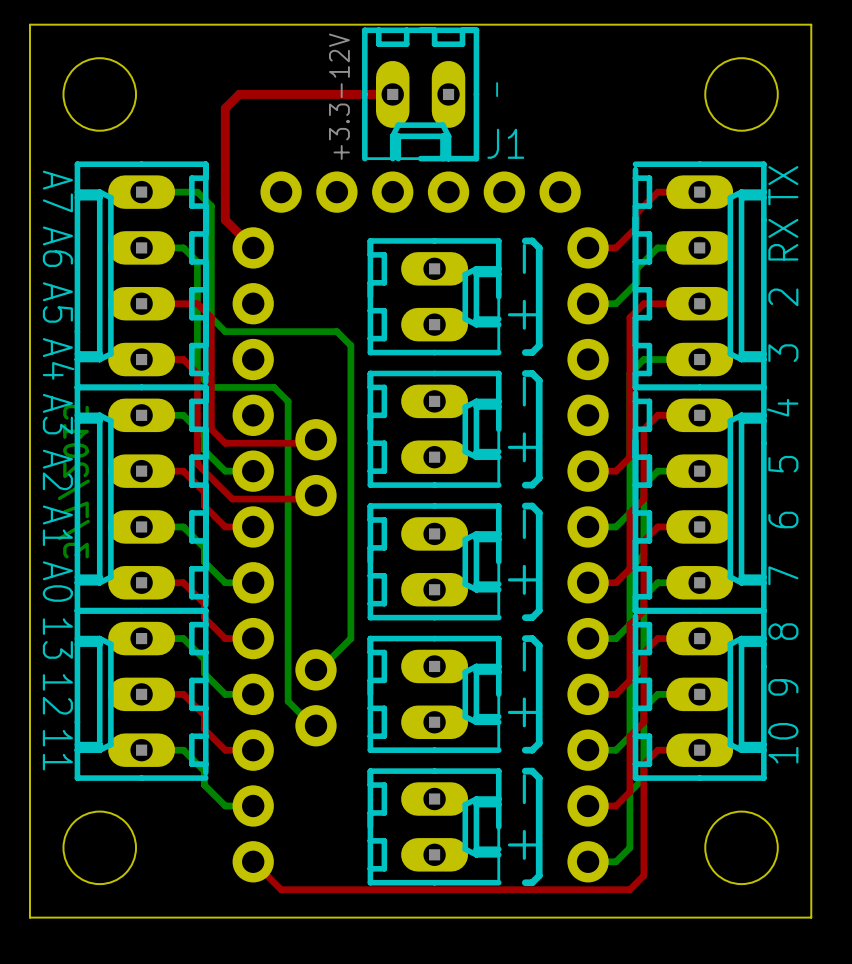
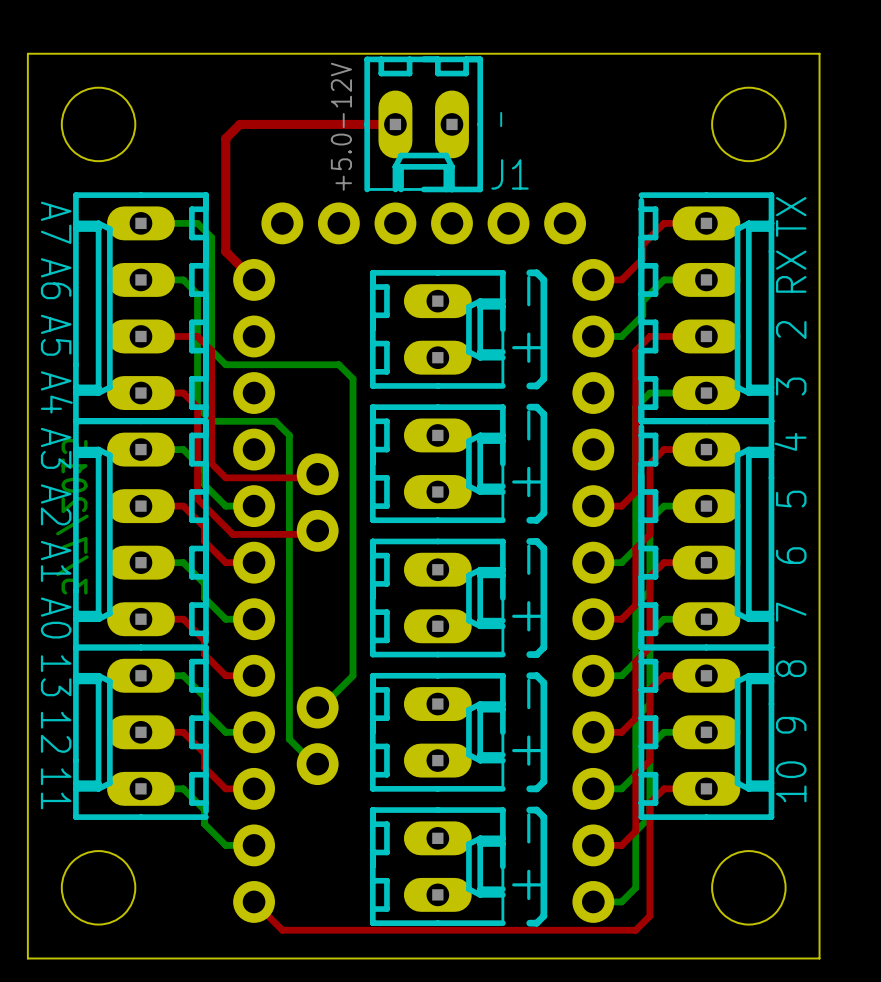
text: +3.3-12V (339, 96) -> +5.0-12V (341, 126)

